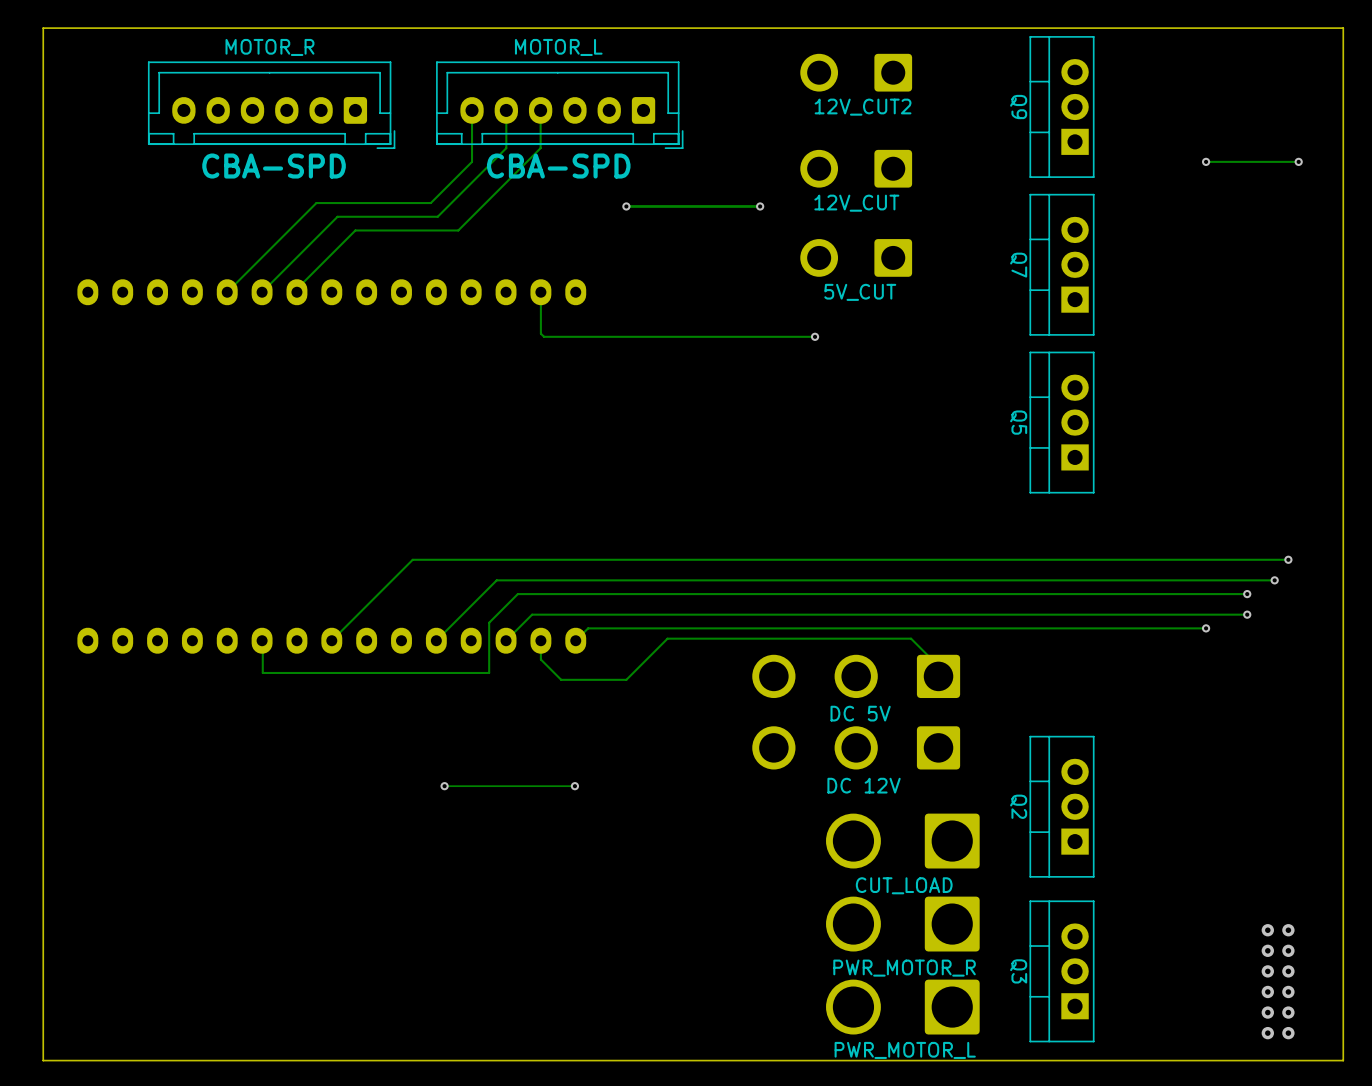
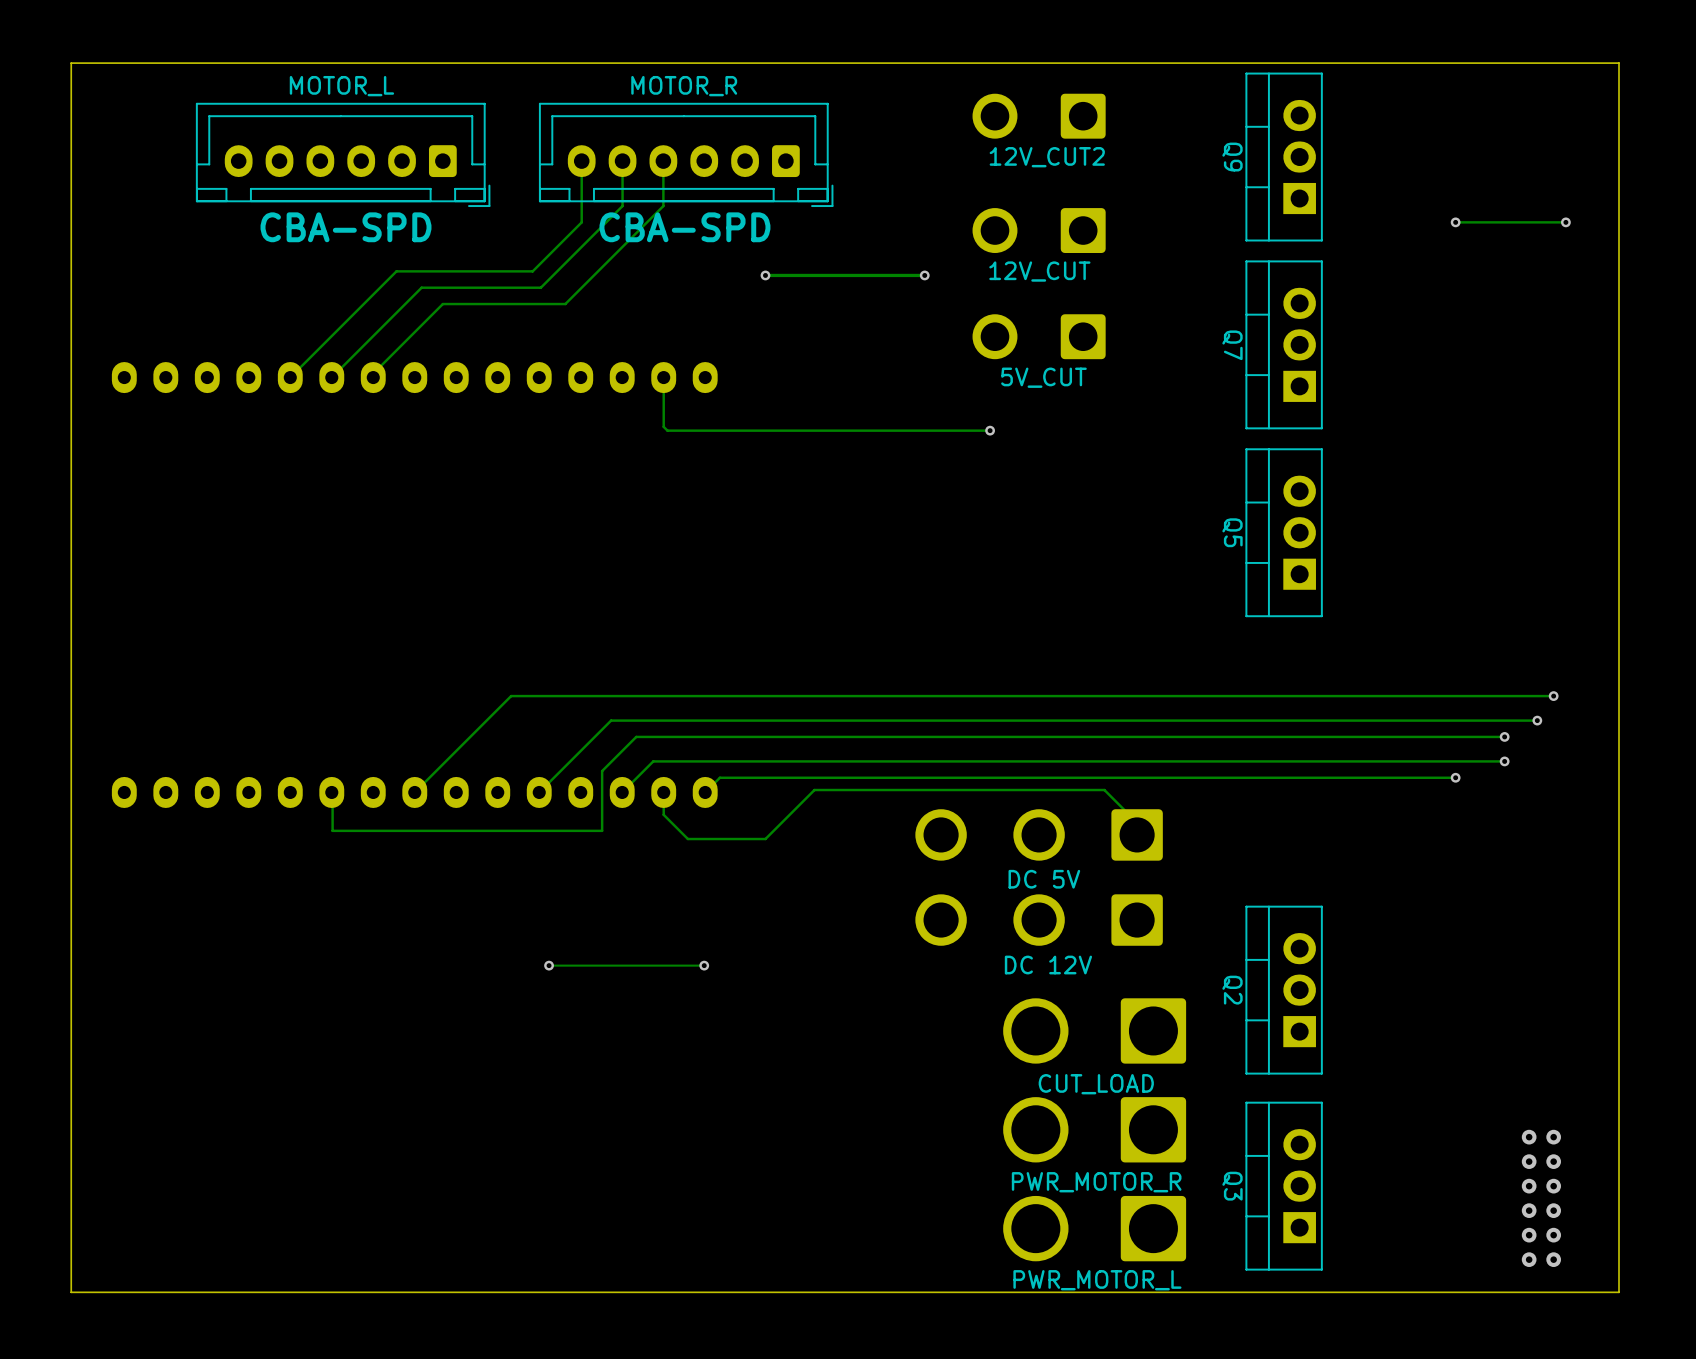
part value: MOTOR_R (269, 47) -> MOTOR_L (341, 86)
part value: MOTOR_L (558, 47) -> MOTOR_R (684, 86)

